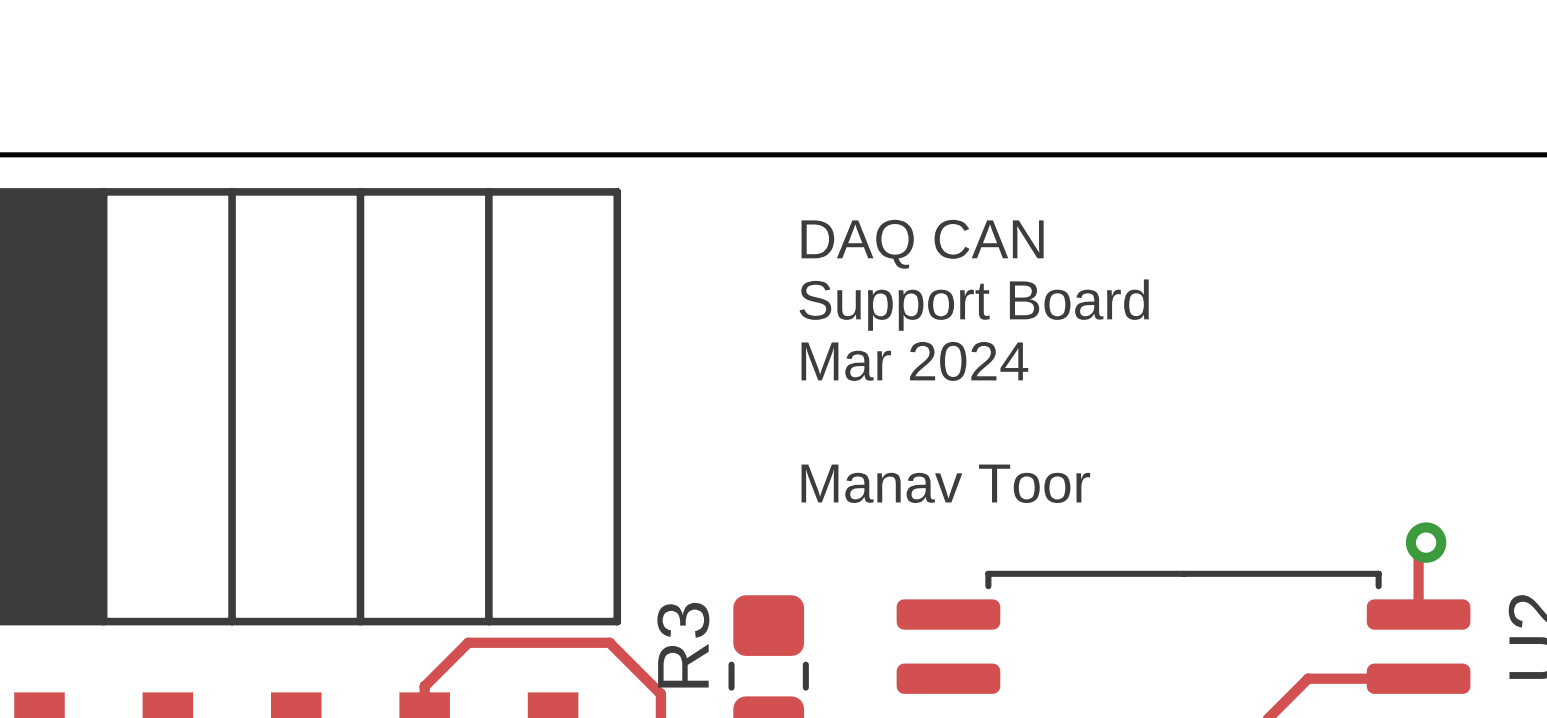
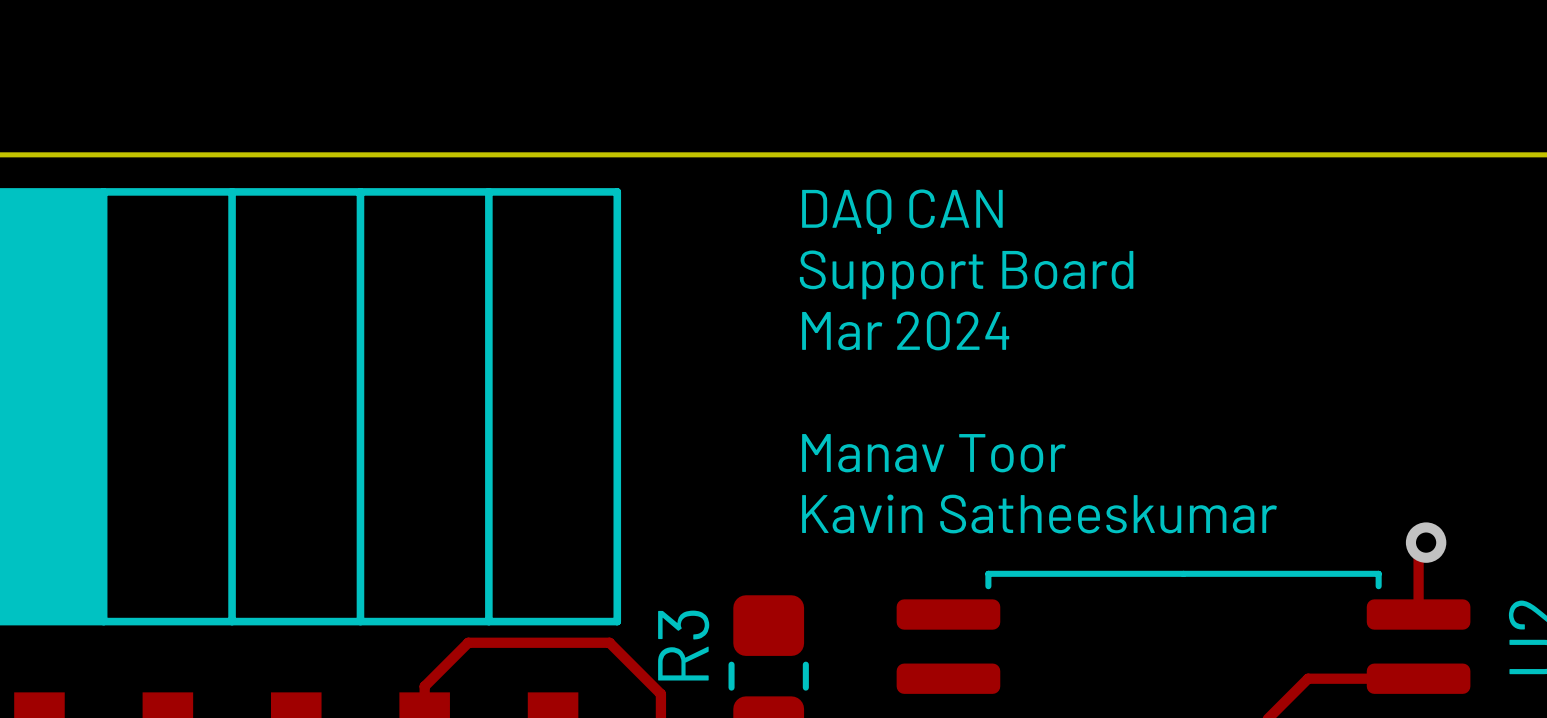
text position: DAQ CAN (922, 244) -> DAQ CAN (902, 211)
text position: Support Board (974, 305) -> Support Board (966, 274)
text position: Mar 2024 (914, 361) -> Mar 2024 (905, 330)
text position: Manav Toor (945, 483) -> Manav Toor (933, 453)
text: none -> Kavin Satheeskumar (1039, 514)

